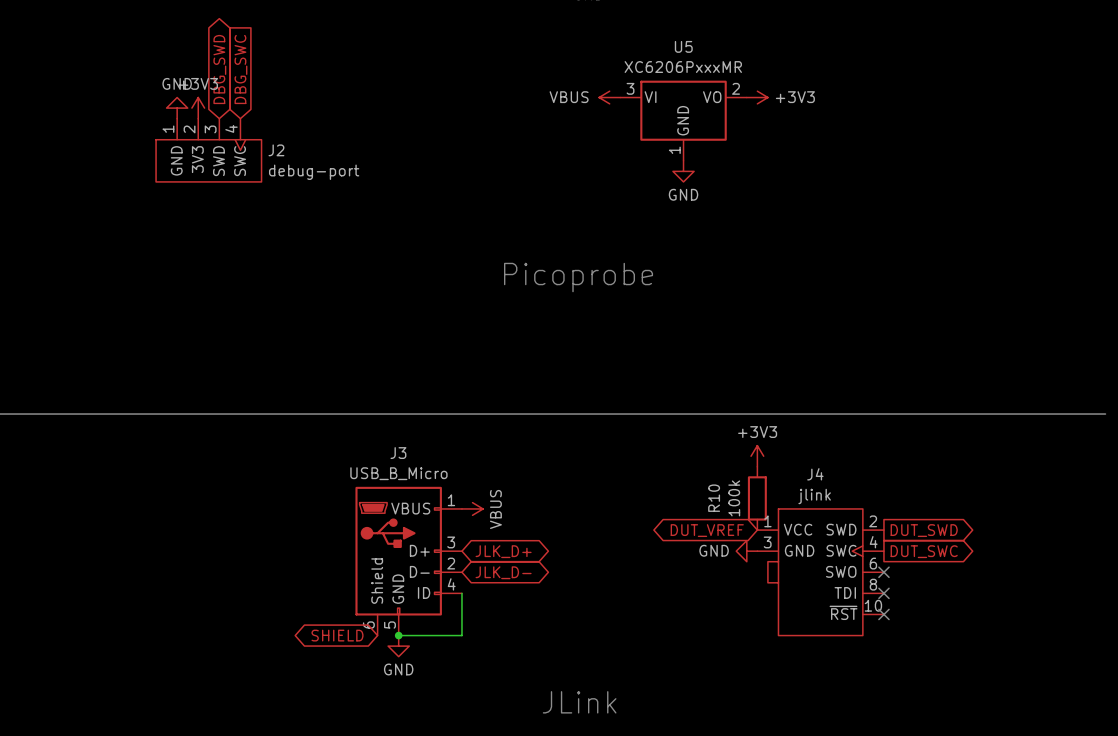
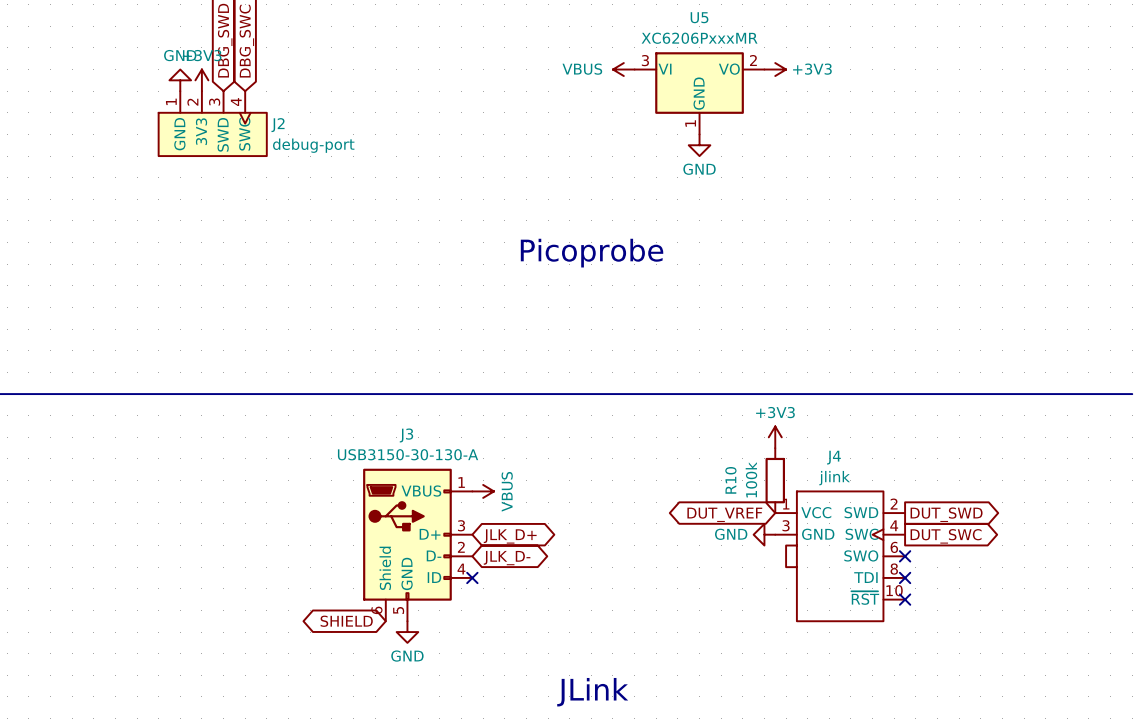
J3 value: USB_B_Micro (398, 473) -> USB3150-30-130-A (408, 454)
wire: (461, 593) (461, 635) (398, 635) -> none
no-connect mark: none -> (472, 577)
junction: (398, 635) -> none

